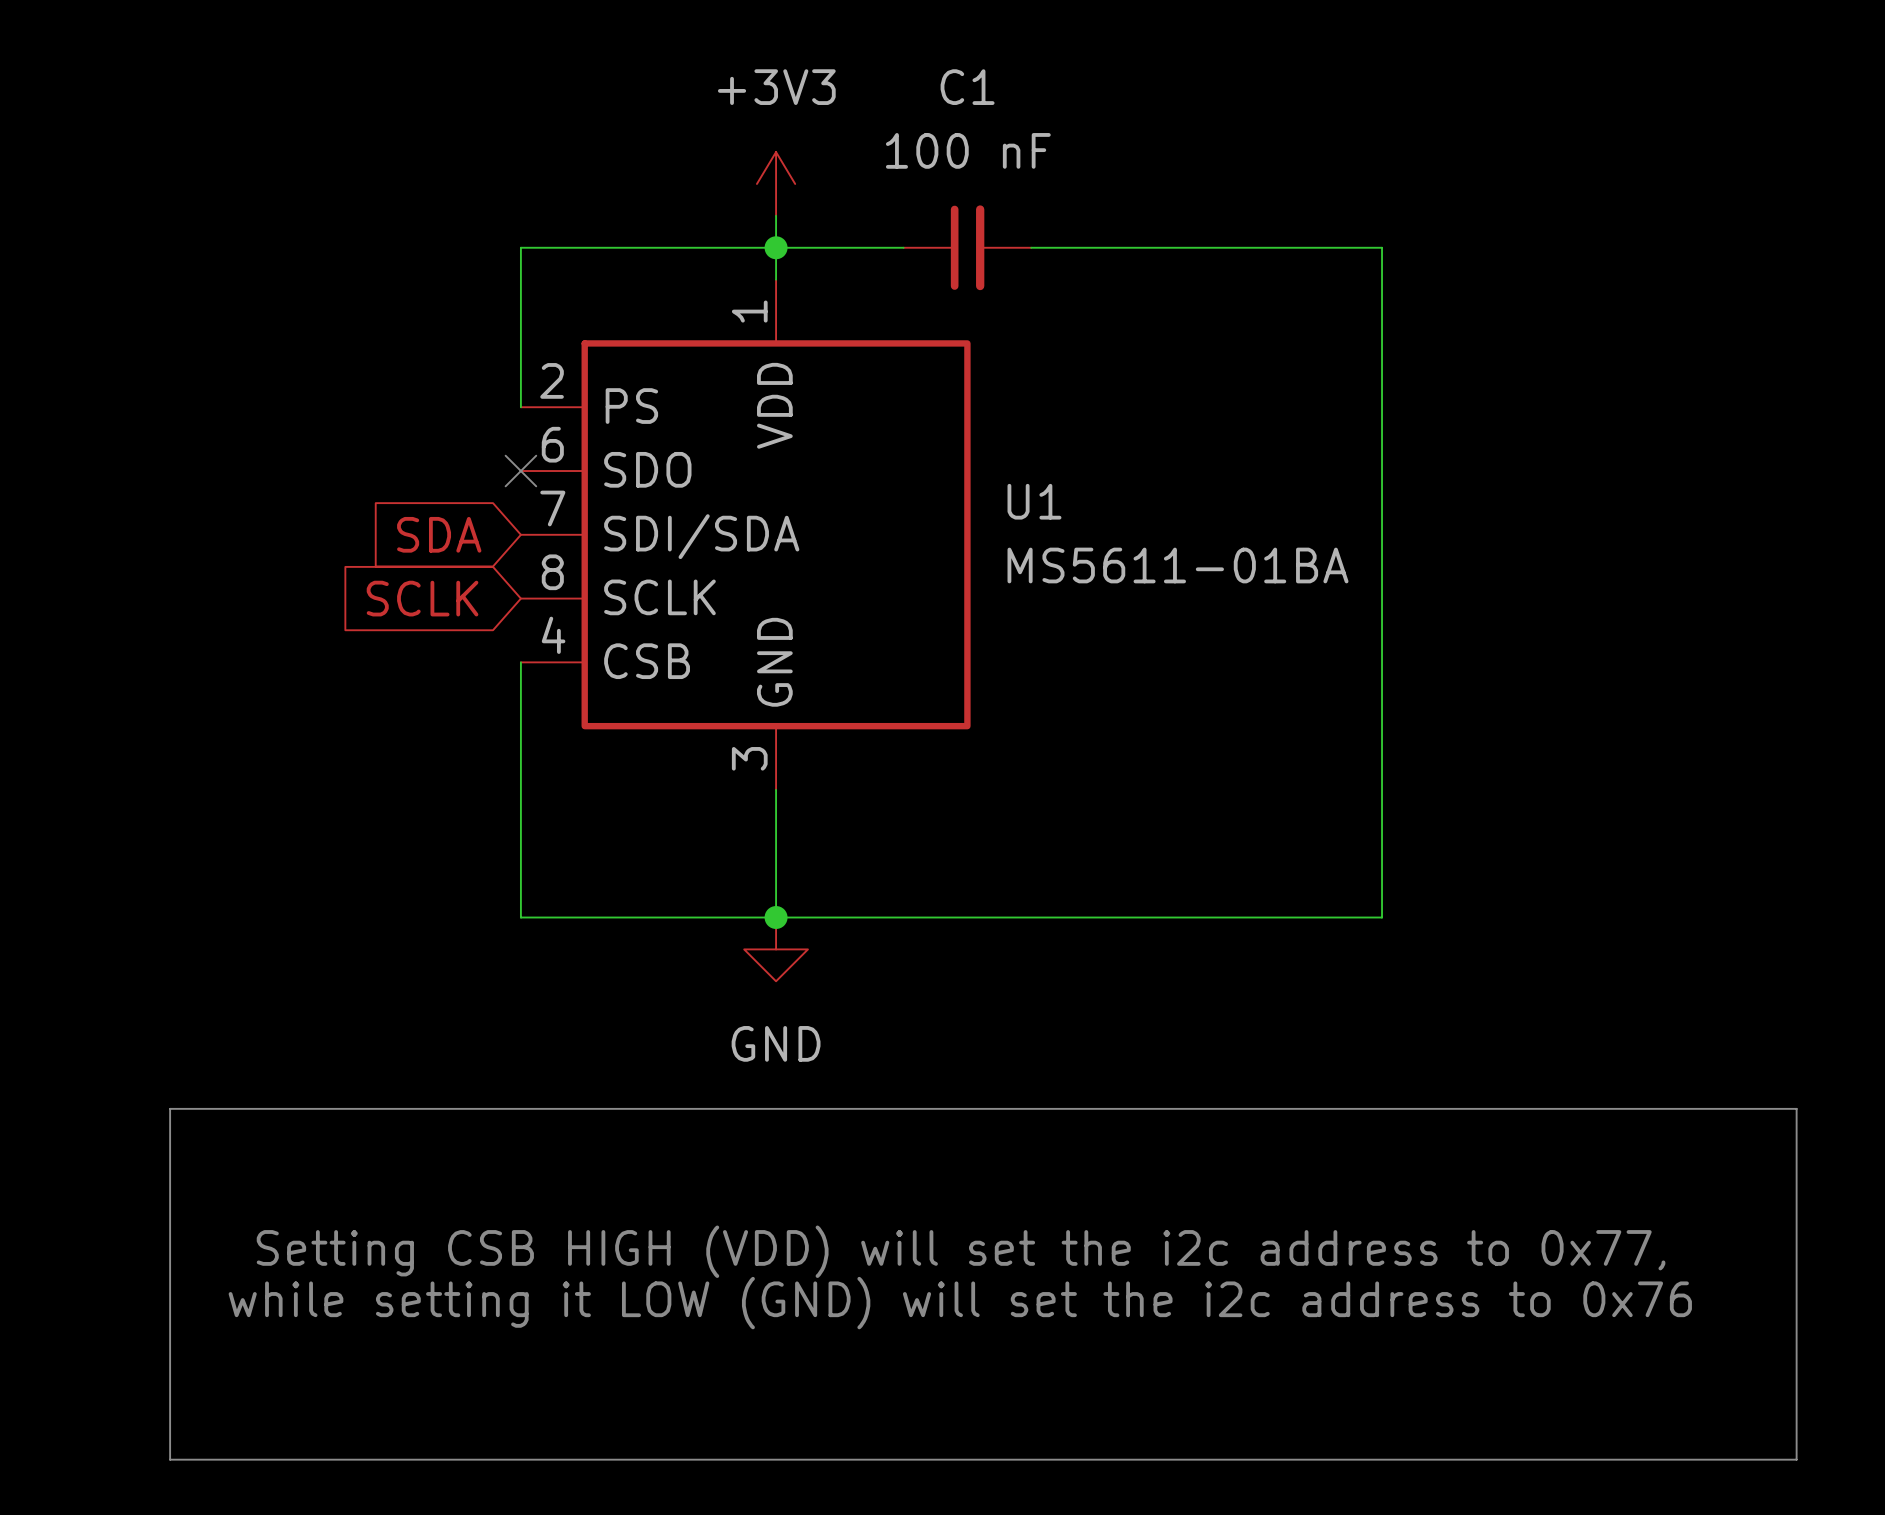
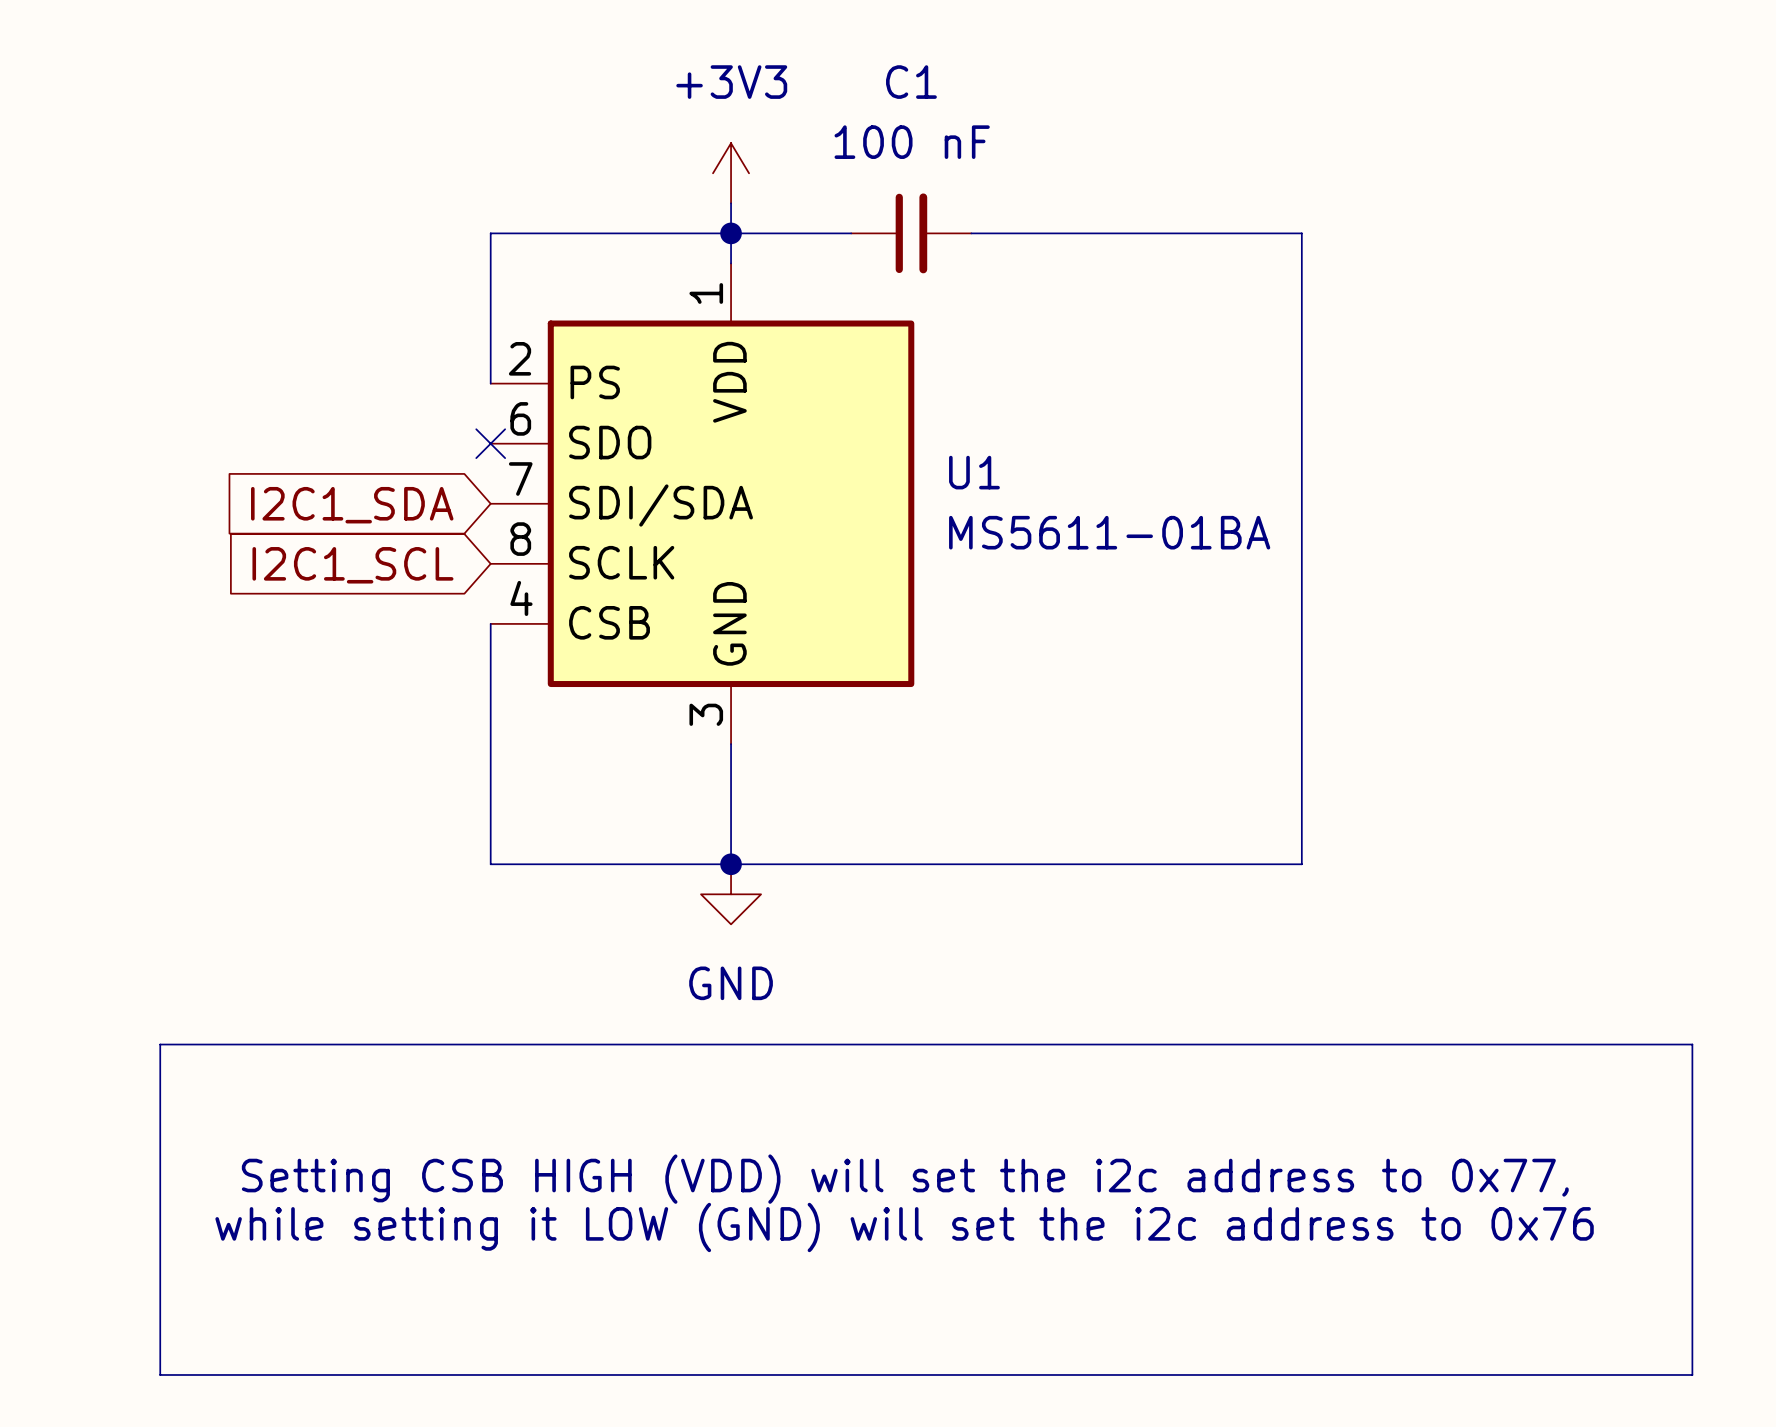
global label: SDA (439, 534) -> I2C1_SDA (352, 505)
global label: SCLK (422, 598) -> I2C1_SCL (352, 565)

